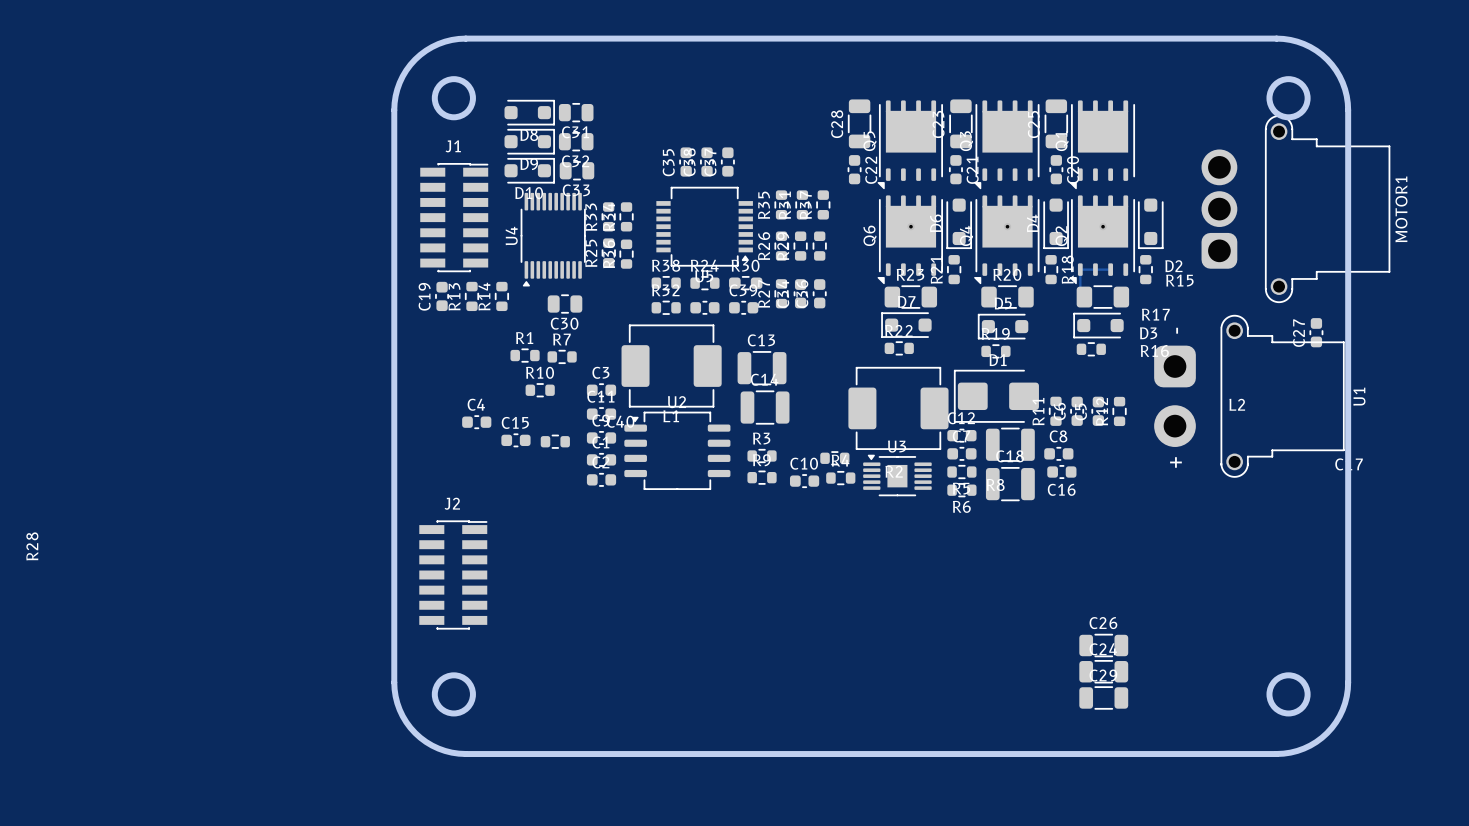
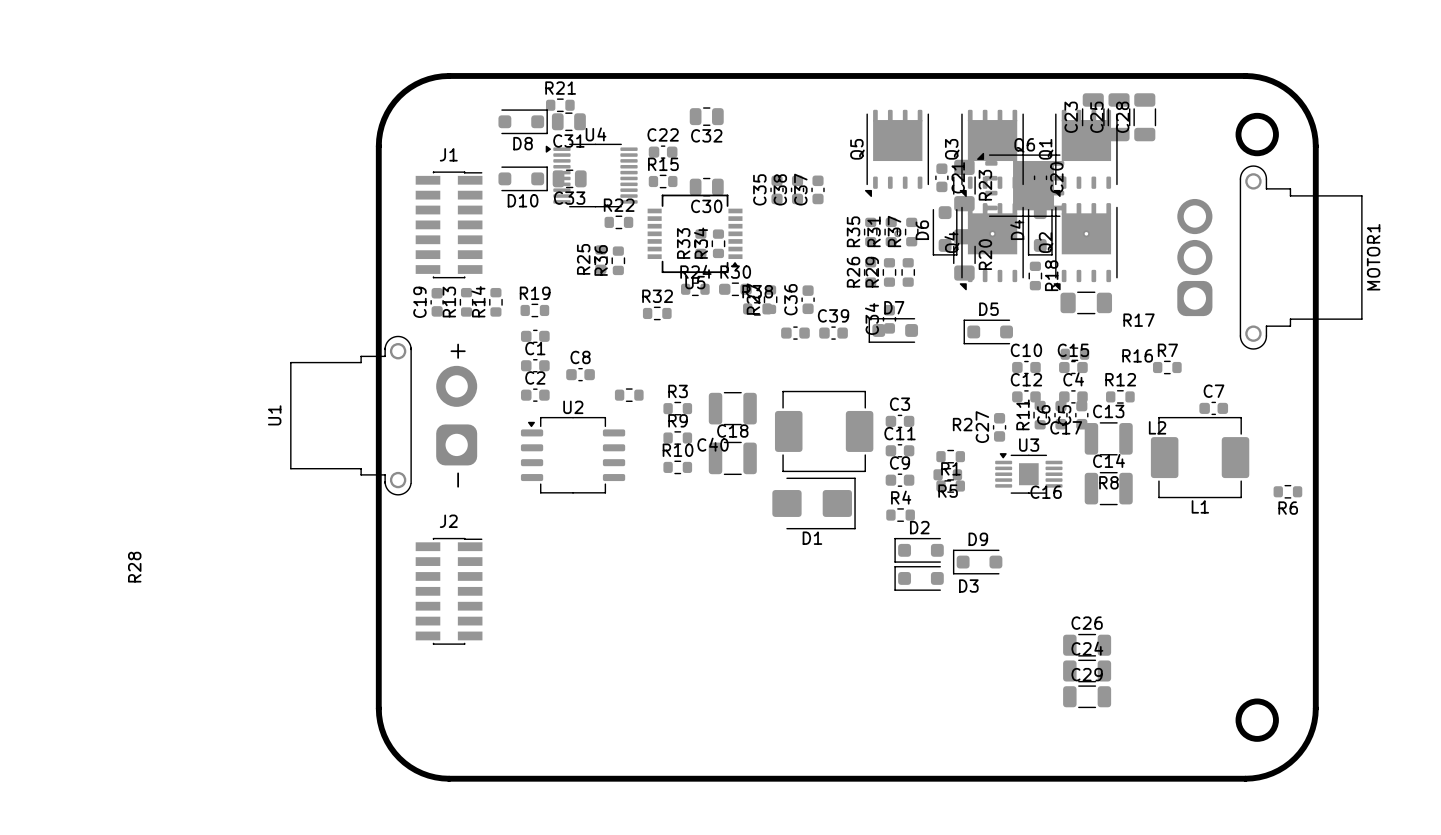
board edge: (465, 38) (1276, 38) (1303, 44) (1322, 54) (1336, 70) (1342, 82) (1348, 110) (1348, 682) (1345, 703) (1331, 727) (1310, 745) (1297, 750) (1276, 754) (465, 754) (438, 748) (420, 737) (402, 716) (397, 703) (394, 682) (394, 103) (402, 76) (420, 54) (445, 41) (465, 38) -> (449, 75) (1245, 75) (1272, 81) (1290, 91) (1303, 107) (1310, 119) (1315, 146) (1315, 708) (1312, 728) (1299, 753) (1278, 770) (1265, 775) (1245, 778) (449, 778) (422, 773) (404, 762) (390, 747) (384, 735) (378, 708) (379, 139) (384, 119) (399, 96) (422, 81) (449, 75)
round board edge: [431, 76, 476, 121] -> none
round board edge position: (1288, 98) -> (1257, 134)
C28 position: (859, 123) -> (1144, 117)
C23 position: (960, 123) -> (1093, 117)
C25 position: (1056, 123) -> (1119, 117)
D9 rotation: 0° (529, 141) -> 180° (977, 562)
D9 position: (529, 141) -> (977, 562)
C32 position: (576, 141) -> (706, 116)
C35 position: (686, 162) -> (777, 189)
C38 position: (707, 162) -> (797, 189)
C37 position: (727, 162) -> (818, 189)
C22 rotation: 0° (854, 169) -> 90° clockwise (663, 152)
C22 position: (854, 169) -> (663, 152)
C22 name position: C22 (871, 170) -> C22 (663, 134)
R35 position: (781, 204) -> (870, 232)
R31 position: (802, 204) -> (891, 232)
R37 position: (823, 204) -> (911, 232)
MOTOR1 position: (1295, 209) -> (1269, 257)
R33 position: (608, 216) -> (700, 243)
R34 position: (626, 216) -> (718, 243)
D2 rotation: 0° (1150, 223) -> 90° clockwise (919, 550)
D2 position: (1150, 223) -> (919, 550)
U4 rotation: 0° (553, 239) -> 90° clockwise (591, 175)
U4 position: (553, 239) -> (591, 175)
Q6 rotation: 0° (910, 239) -> 90° clockwise (1020, 184)
Q6 position: (910, 239) -> (1020, 184)
R26 position: (781, 246) -> (870, 272)
R29 position: (800, 246) -> (889, 272)
R28 position: (819, 246) -> (908, 272)
D2 name position: D2 (1173, 266) -> D2 (919, 527)
R21 rotation: 0° (954, 269) -> 90° clockwise (560, 105)
R21 position: (954, 269) -> (560, 105)
track: (1110, 269) (1080, 269) (1080, 288) (1084, 292) (1084, 297) -> none
R15 rotation: 0° (1145, 269) -> 90° clockwise (663, 181)
R15 position: (1145, 269) -> (663, 181)
R15 name position: R15 (1179, 280) -> R15 (663, 164)
R38 position: (666, 283) -> (757, 308)
C34 position: (800, 293) -> (889, 319)
R23 rotation: 0° (910, 297) -> 90° clockwise (964, 185)
R23 position: (910, 297) -> (964, 185)
R20 rotation: 0° (1007, 297) -> 90° clockwise (964, 254)
R20 position: (1007, 297) -> (964, 254)
C30 position: (565, 304) -> (706, 187)
C40 position: (704, 307) -> (795, 333)
C39 position: (743, 307) -> (833, 333)
D3 position: (1098, 325) -> (919, 578)
C27 position: (1316, 332) -> (999, 427)
R22 position: (899, 348) -> (618, 222)
R19 position: (995, 351) -> (534, 310)
R1 position: (525, 355) -> (950, 486)
R7 position: (562, 356) -> (1167, 367)
L1 position: (671, 366) -> (1200, 457)
C13 position: (762, 368) -> (1108, 438)
R10 position: (540, 390) -> (677, 467)
C3 position: (601, 390) -> (900, 421)
D1 rotation: 0° (996, 396) -> 180° (814, 503)
D1 position: (996, 396) -> (814, 503)
U1 rotation: 0° (1249, 396) -> 180° (383, 415)
U1 position: (1249, 396) -> (383, 415)
C14 position: (765, 407) -> (1108, 488)
L2 position: (898, 408) -> (824, 431)
R12 rotation: 0° (1119, 411) -> 90° clockwise (1120, 396)
R12 position: (1119, 411) -> (1120, 396)
C11 position: (601, 414) -> (900, 450)
C4 position: (476, 422) -> (1073, 396)
C12 position: (961, 435) -> (1026, 396)
C9 position: (601, 437) -> (900, 480)
C15 position: (515, 440) -> (1073, 367)
R2 position: (555, 441) -> (629, 395)
C17 position: (1010, 444) -> (732, 408)
U2 position: (677, 450) -> (573, 455)
C7 position: (961, 453) -> (1213, 408)
C8 position: (1058, 453) -> (580, 374)
R3 position: (762, 455) -> (677, 408)
R8 position: (834, 458) -> (950, 456)
C1 position: (601, 459) -> (535, 365)
C16 position: (1061, 472) -> (535, 336)
U3 position: (897, 475) -> (1028, 473)
R9 position: (762, 477) -> (677, 438)
R4 position: (840, 478) -> (900, 515)
C2 position: (601, 479) -> (535, 395)
C10 position: (804, 481) -> (1026, 367)
C18 position: (1010, 484) -> (732, 458)
R6 position: (961, 490) -> (1287, 491)
J2 position: (453, 574) -> (449, 591)
round board edge: [431, 672, 476, 717] -> none
round board edge position: (1288, 694) -> (1257, 720)

